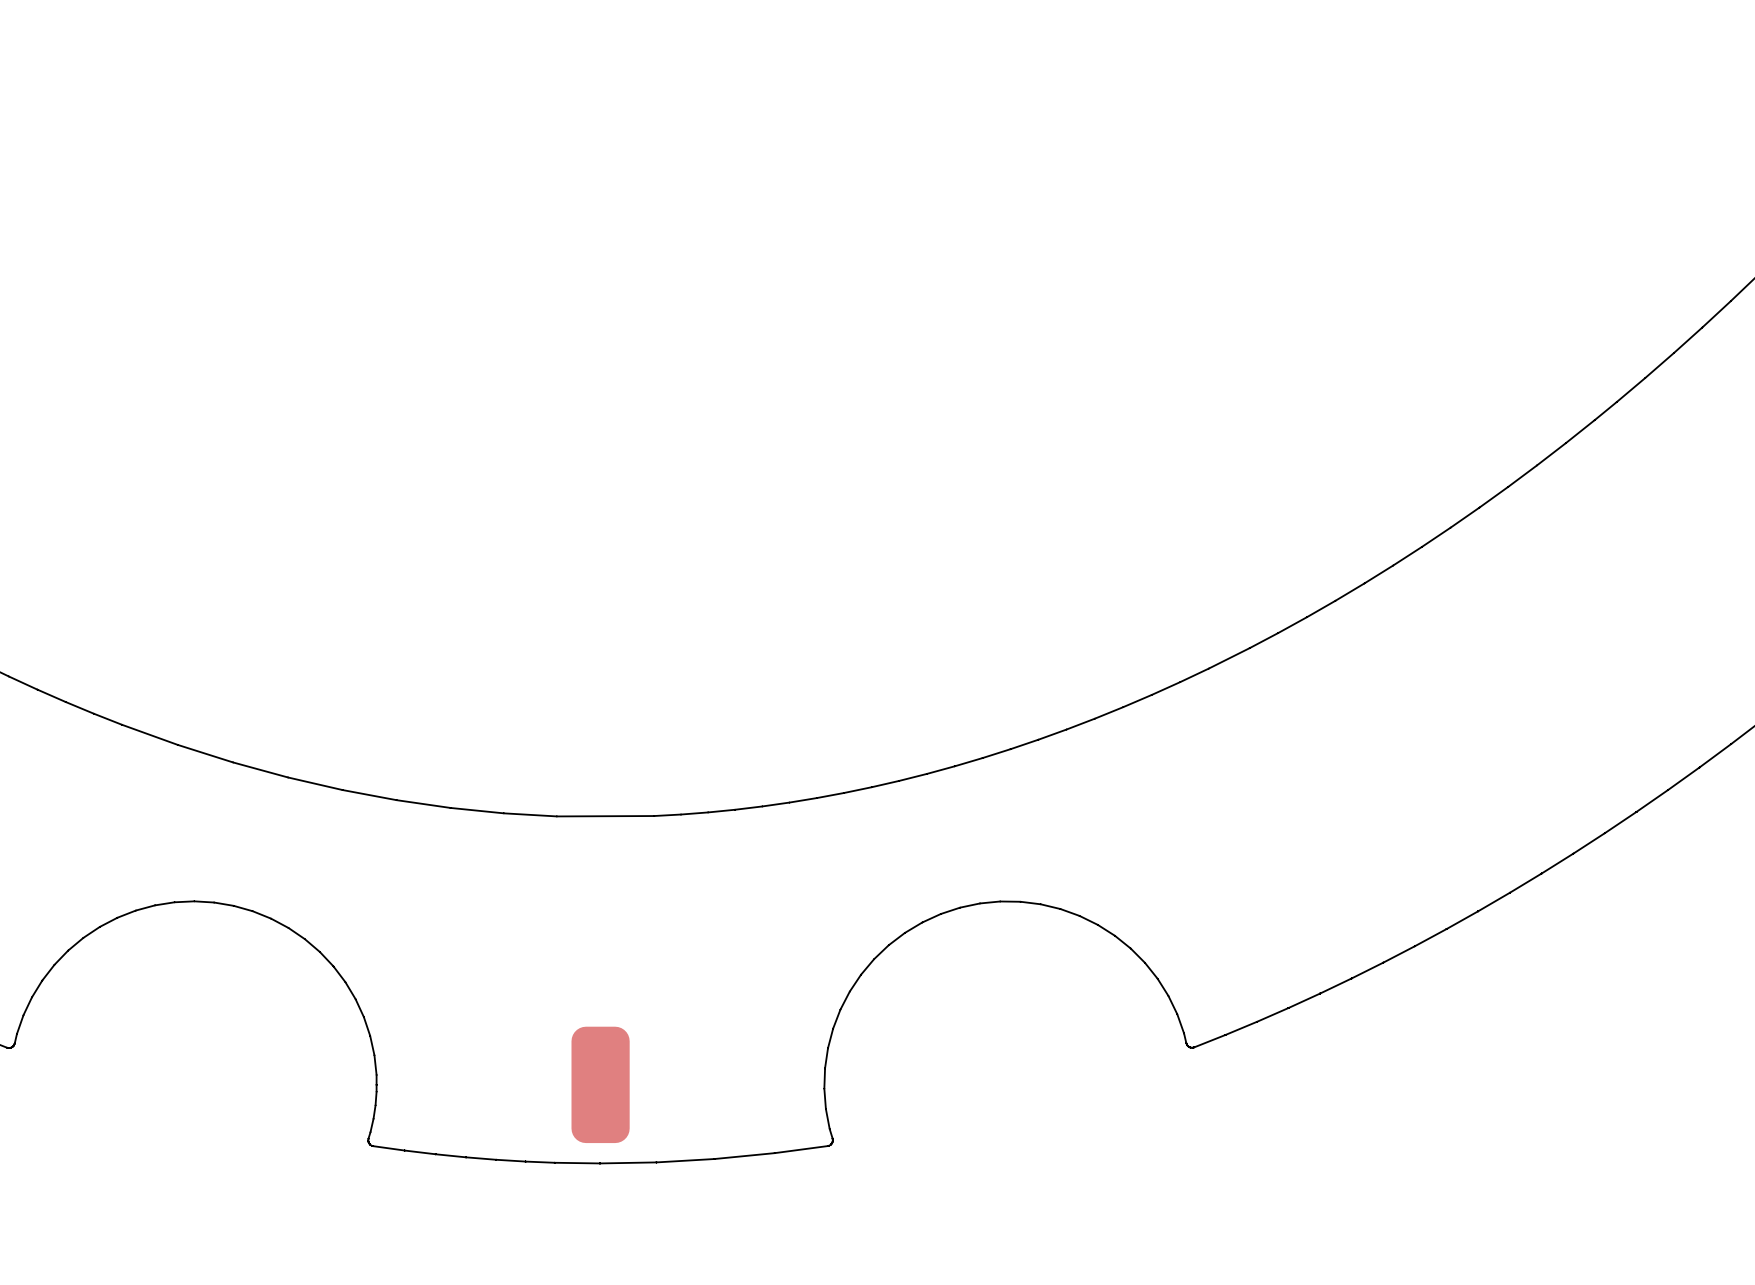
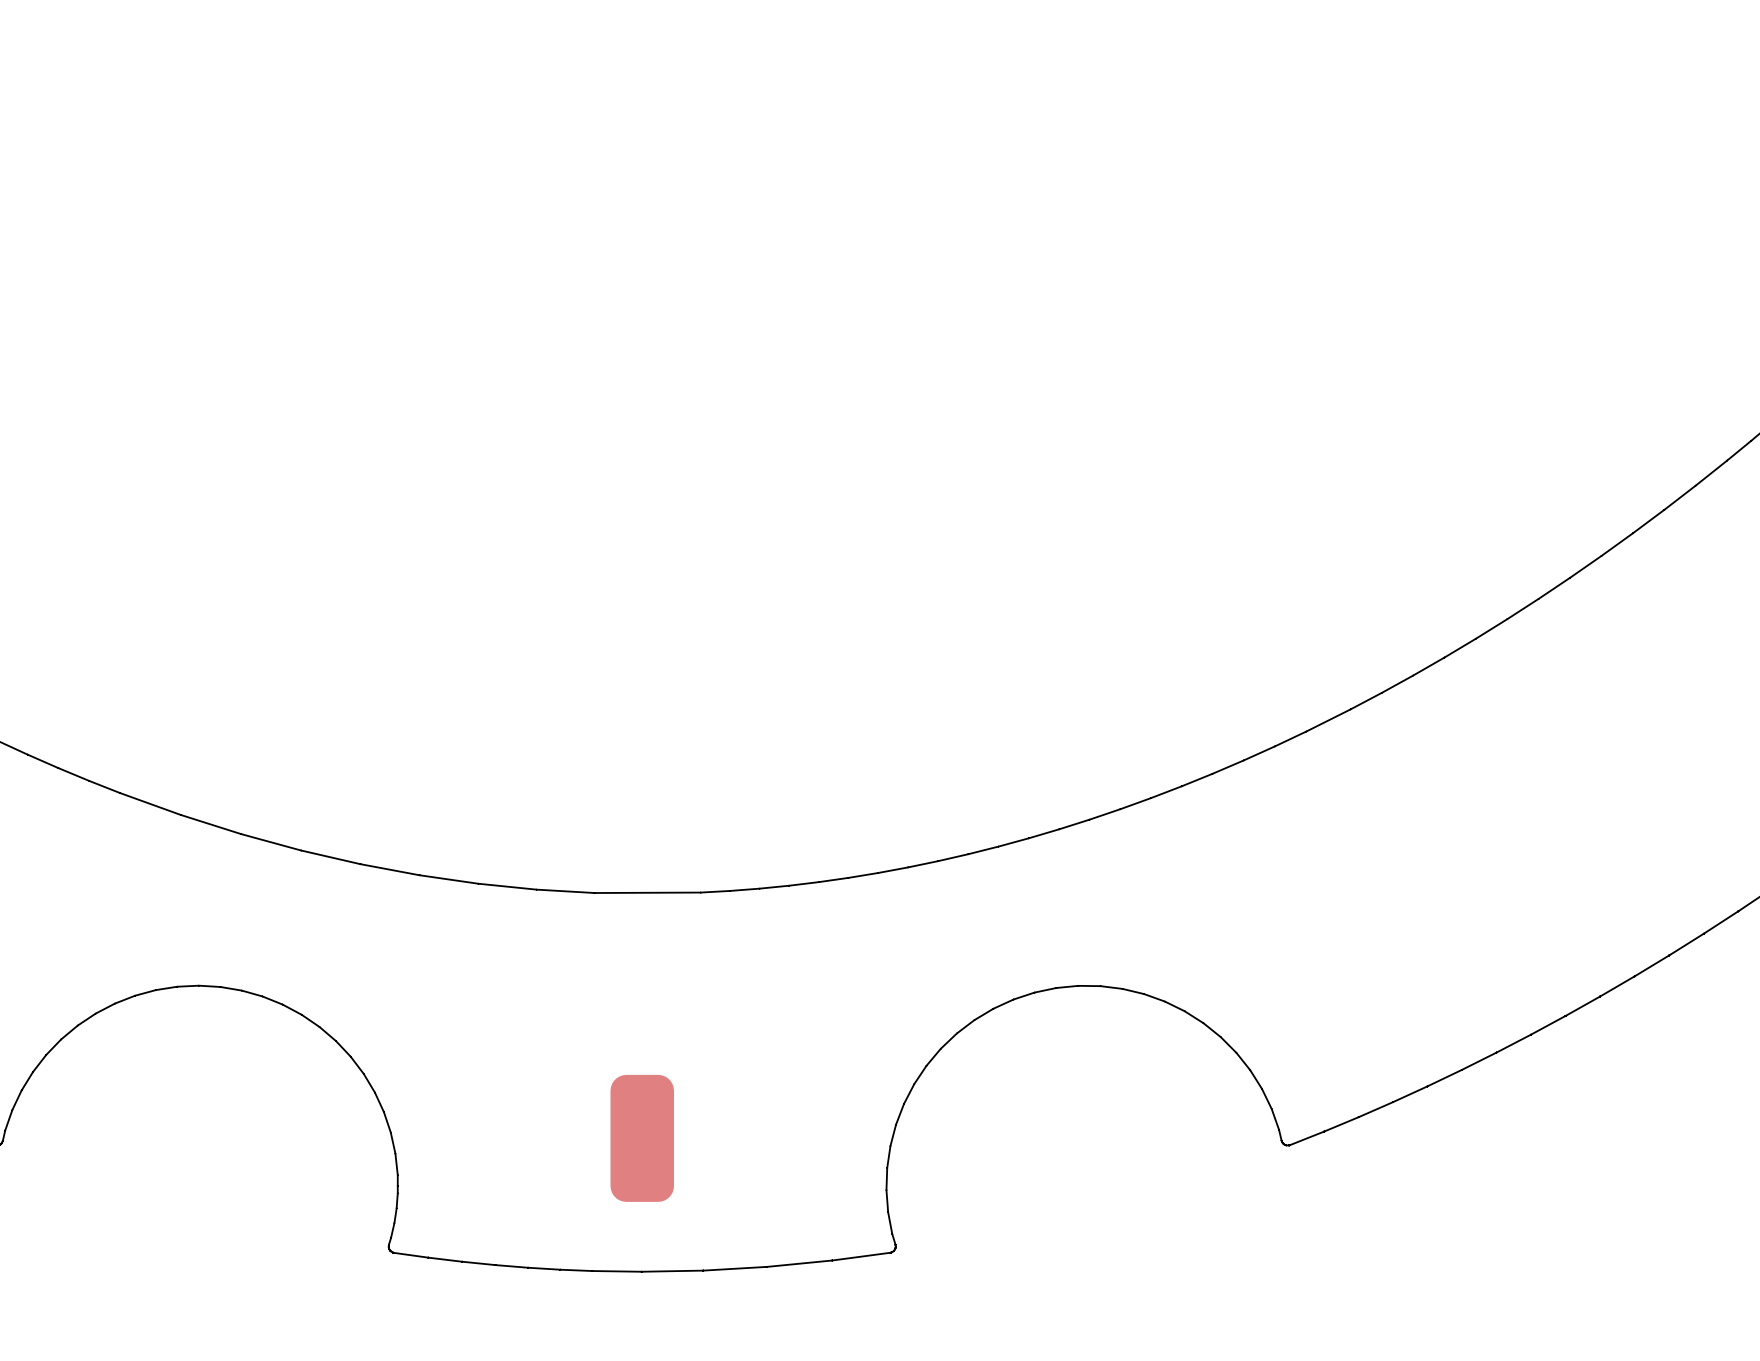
part position: (600, 1084) -> (642, 1138)

